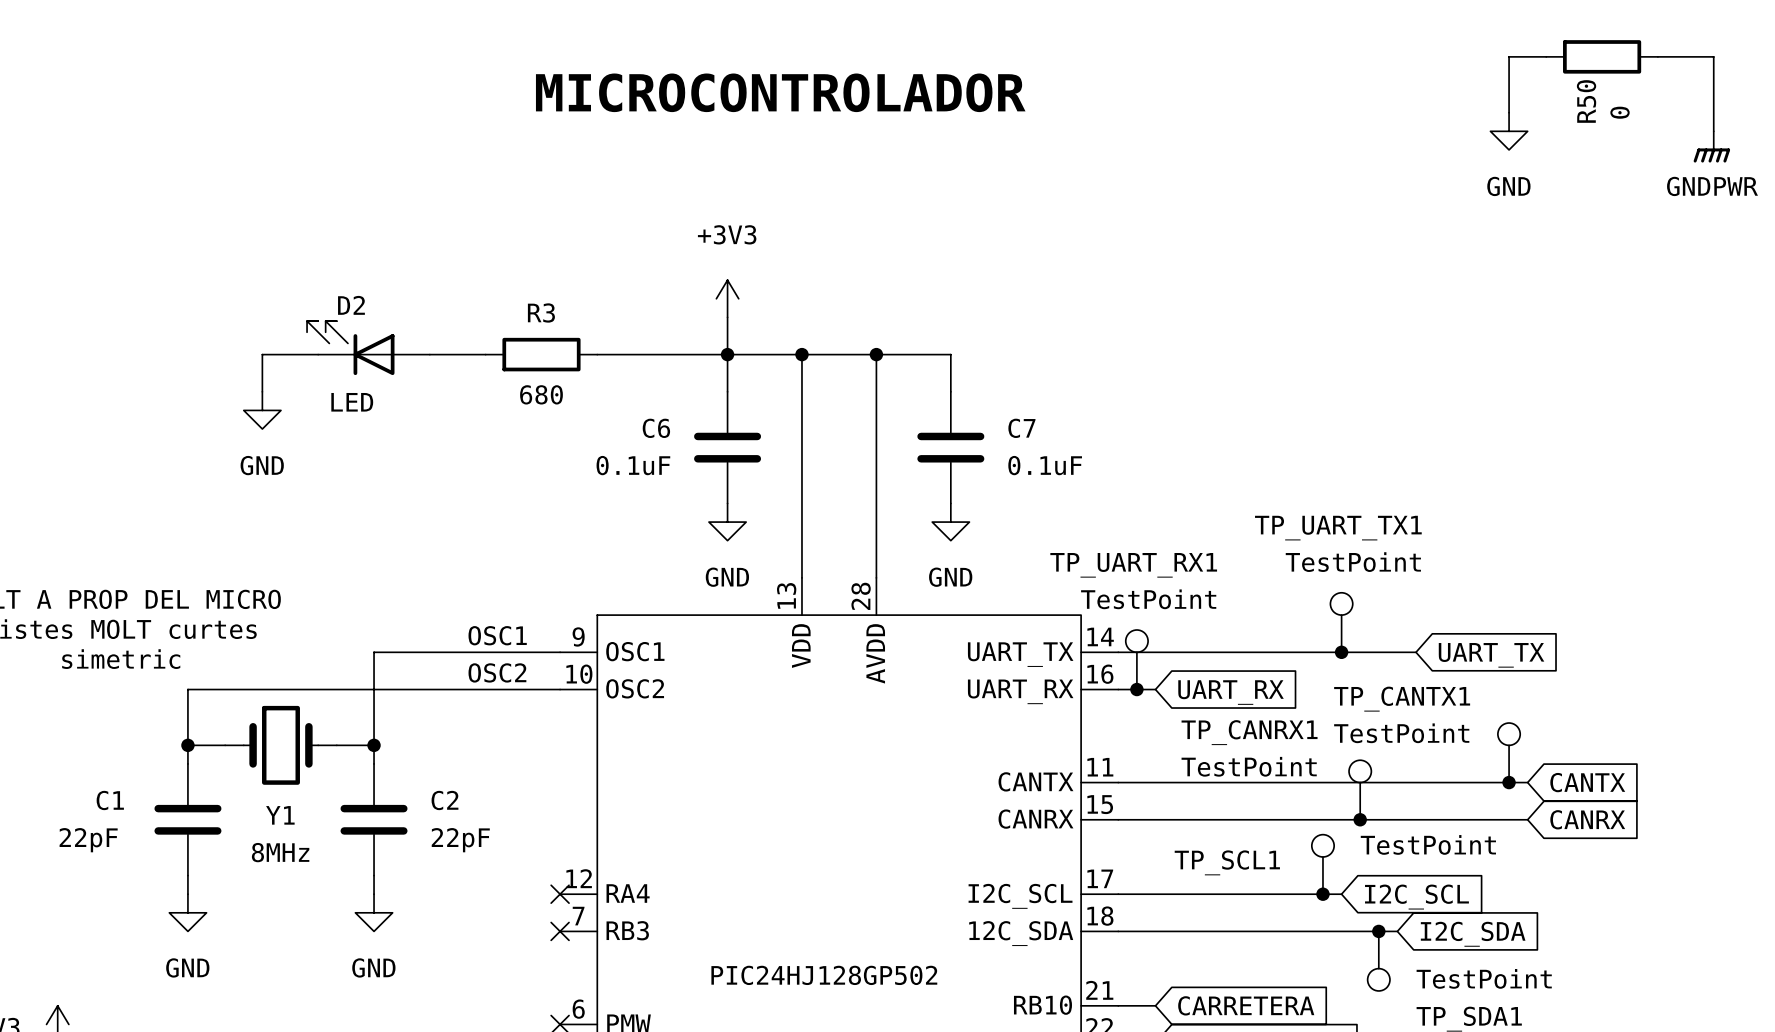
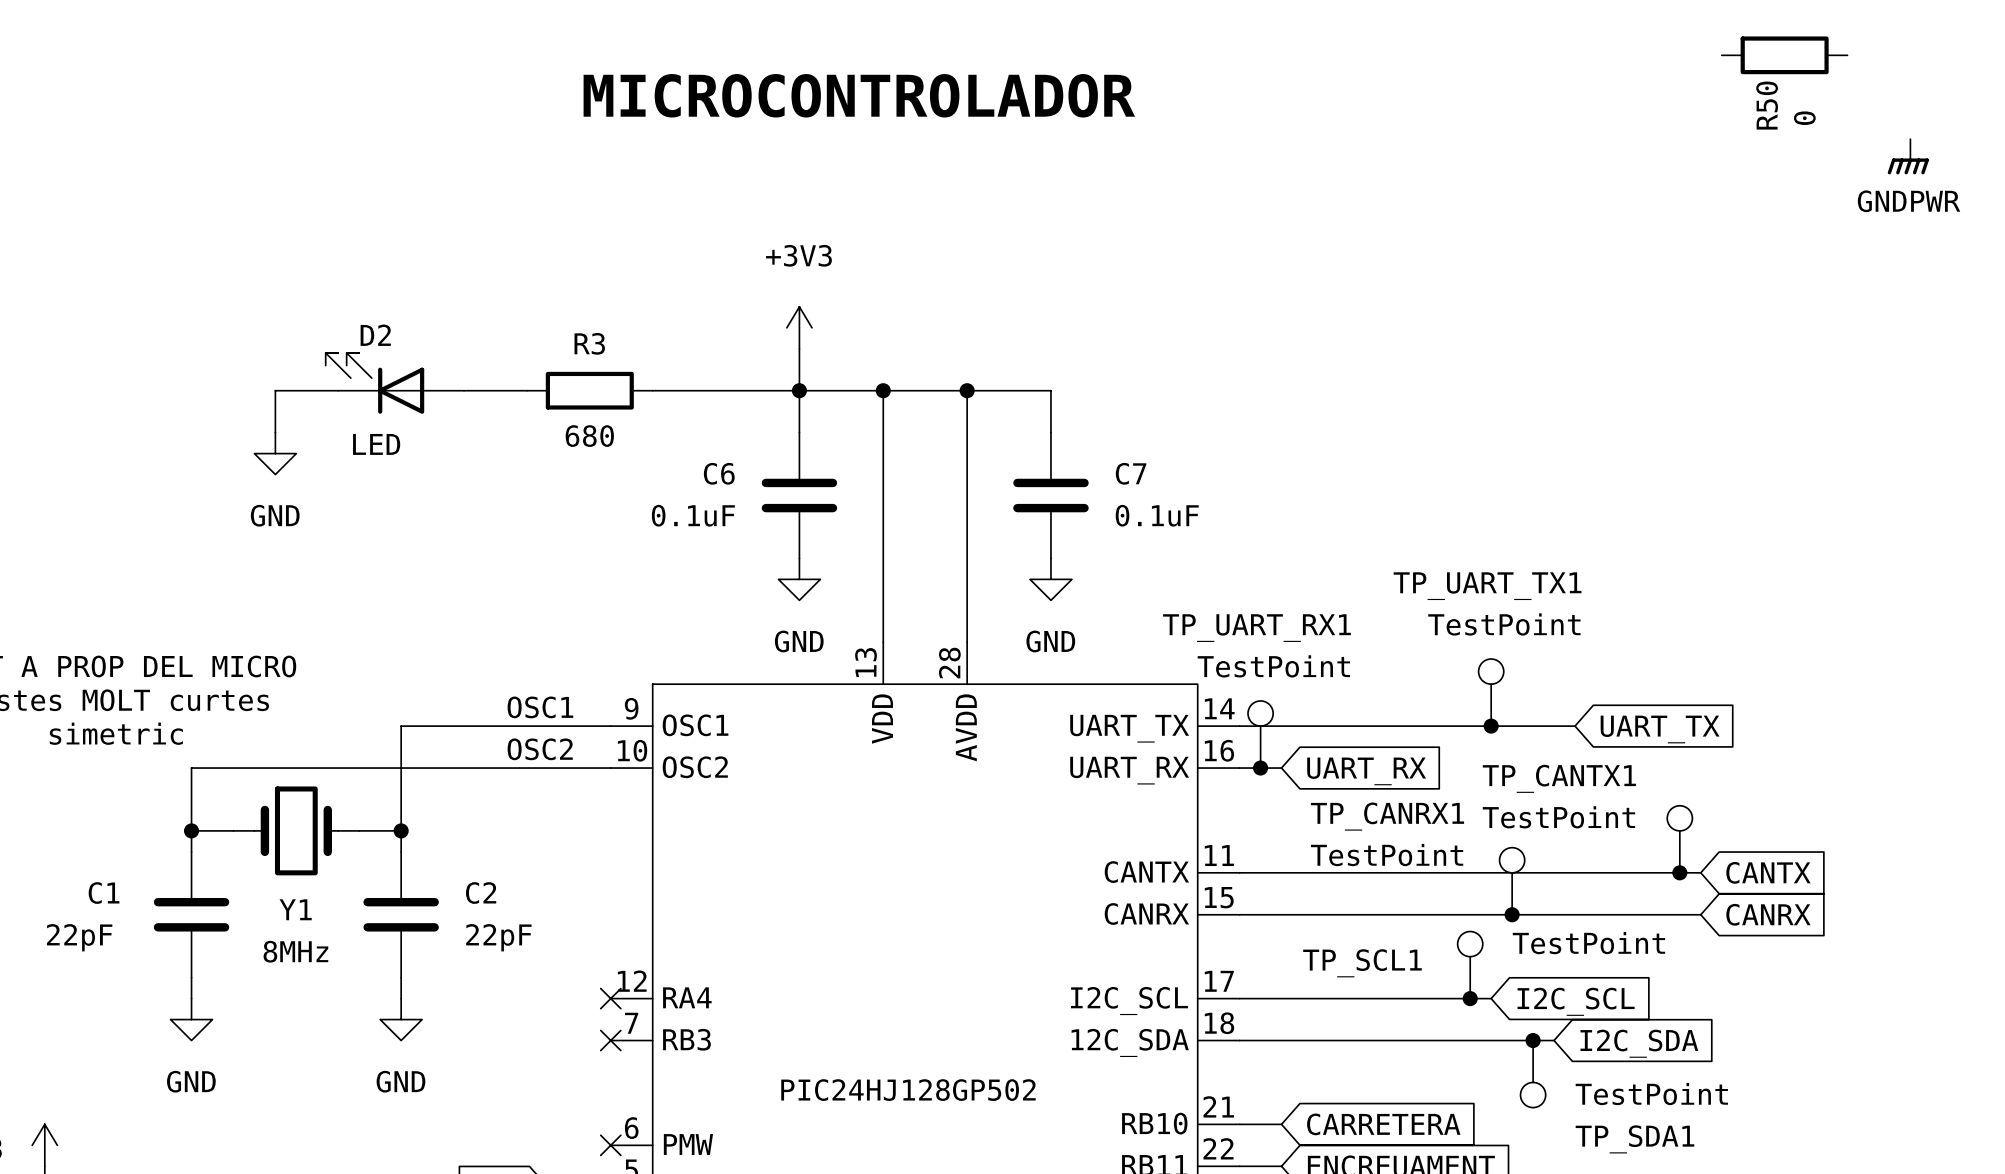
wire: (1546, 56) (1509, 56) (1509, 112) -> none
wire: (1657, 56) (1713, 56) (1713, 131) -> none
power symbol: GND (1509, 131) -> none

